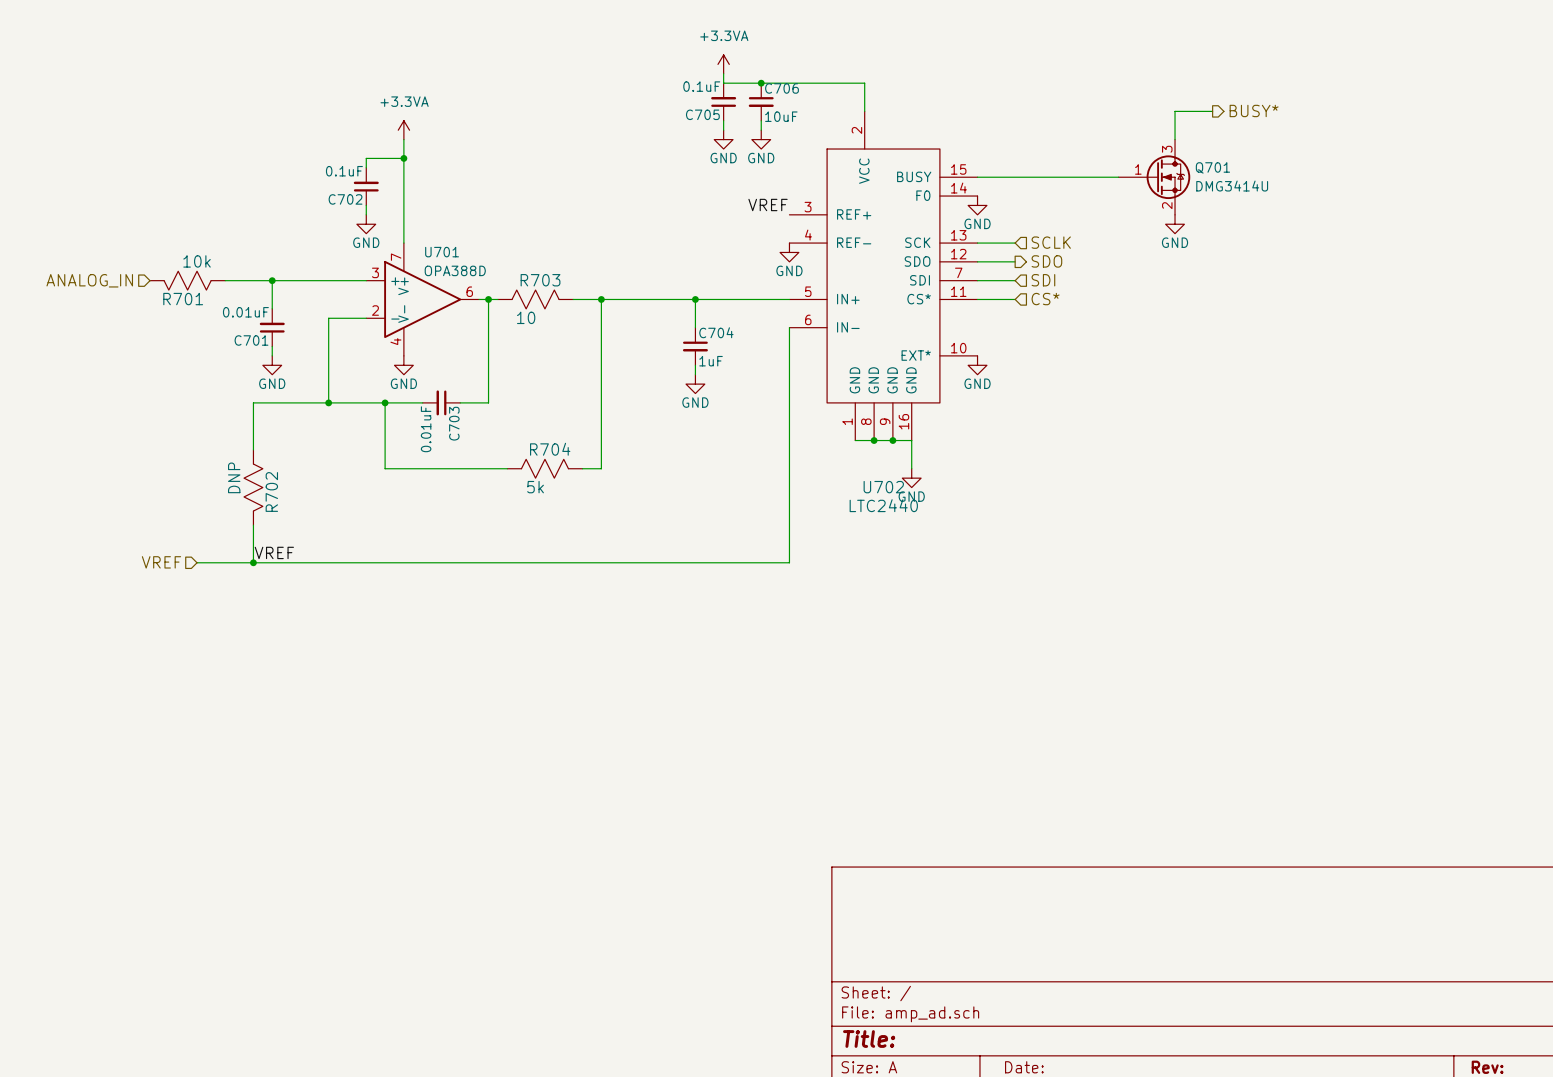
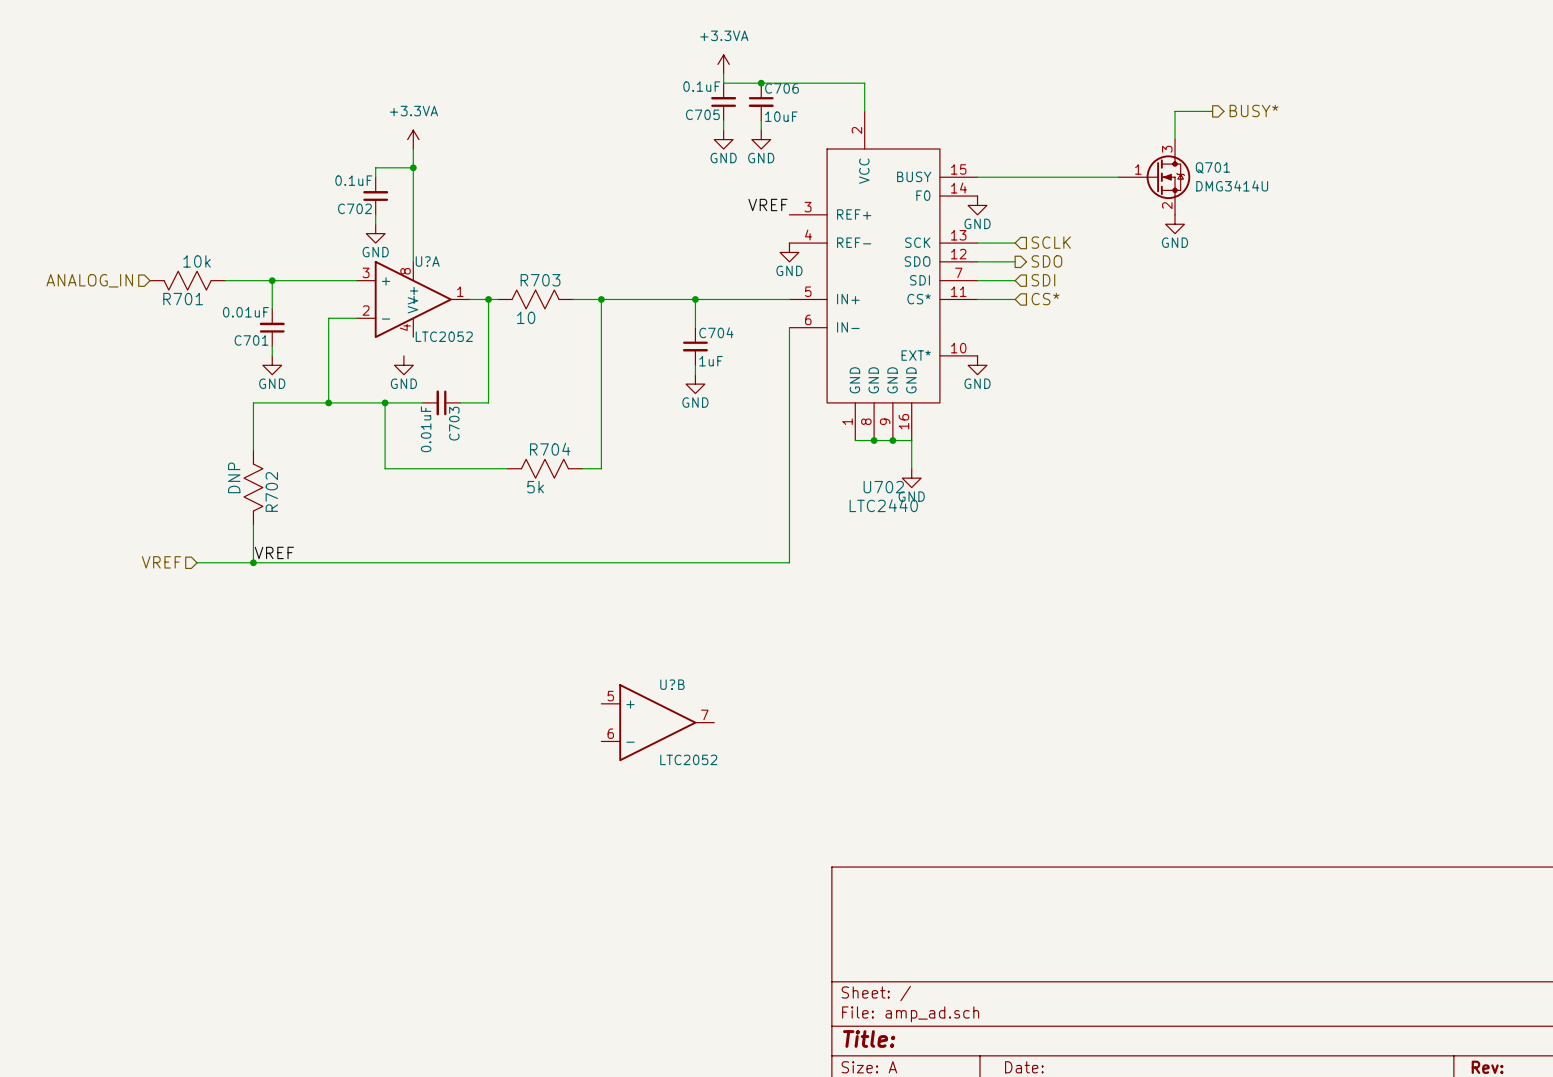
power symbol position: +3.3VA (403, 130) -> +3.3VA (413, 139)
wire: (403, 139) (403, 243) -> none
wire: none -> (413, 149) (413, 261)
wire: (403, 158) (366, 158) (366, 167) -> (413, 167) (375, 167) (375, 177)
junction position: (403, 158) -> (413, 167)
C702 position: (366, 186) -> (375, 196)
wire: (366, 205) (366, 214) -> (375, 214) (375, 224)
power symbol position: GND (366, 224) -> GND (375, 233)
U?A: none -> LTC2052 (413, 299)
U701: OPA388D (422, 299) -> none
U?B: none -> LTC2052 (657, 722)

